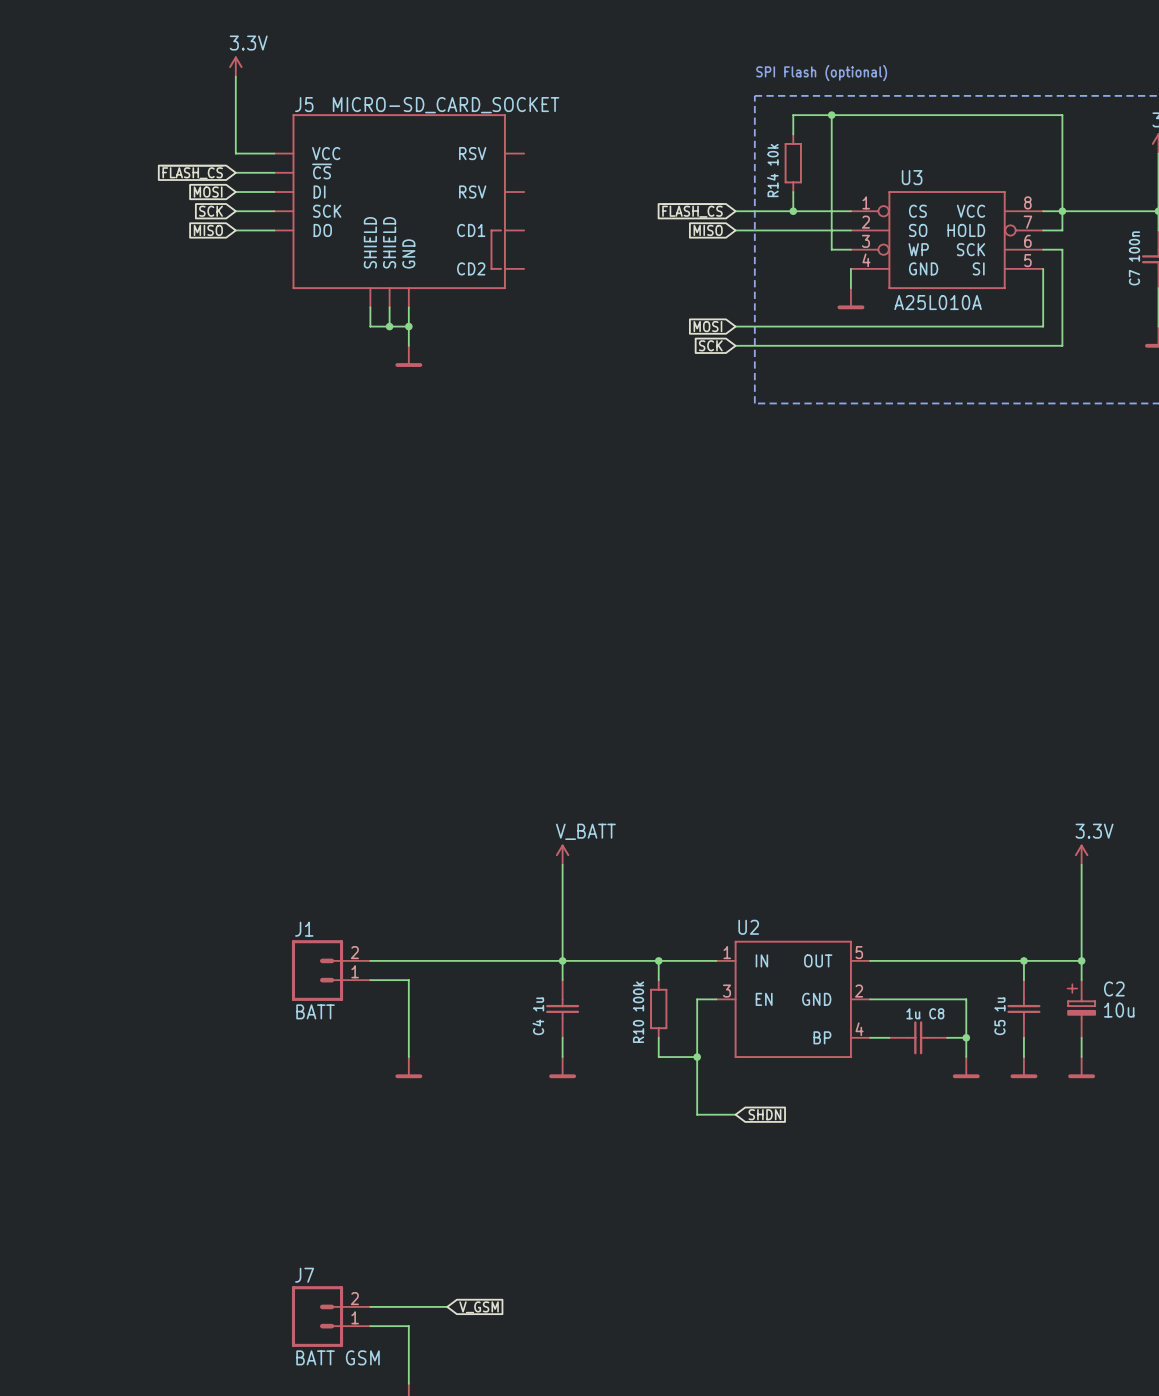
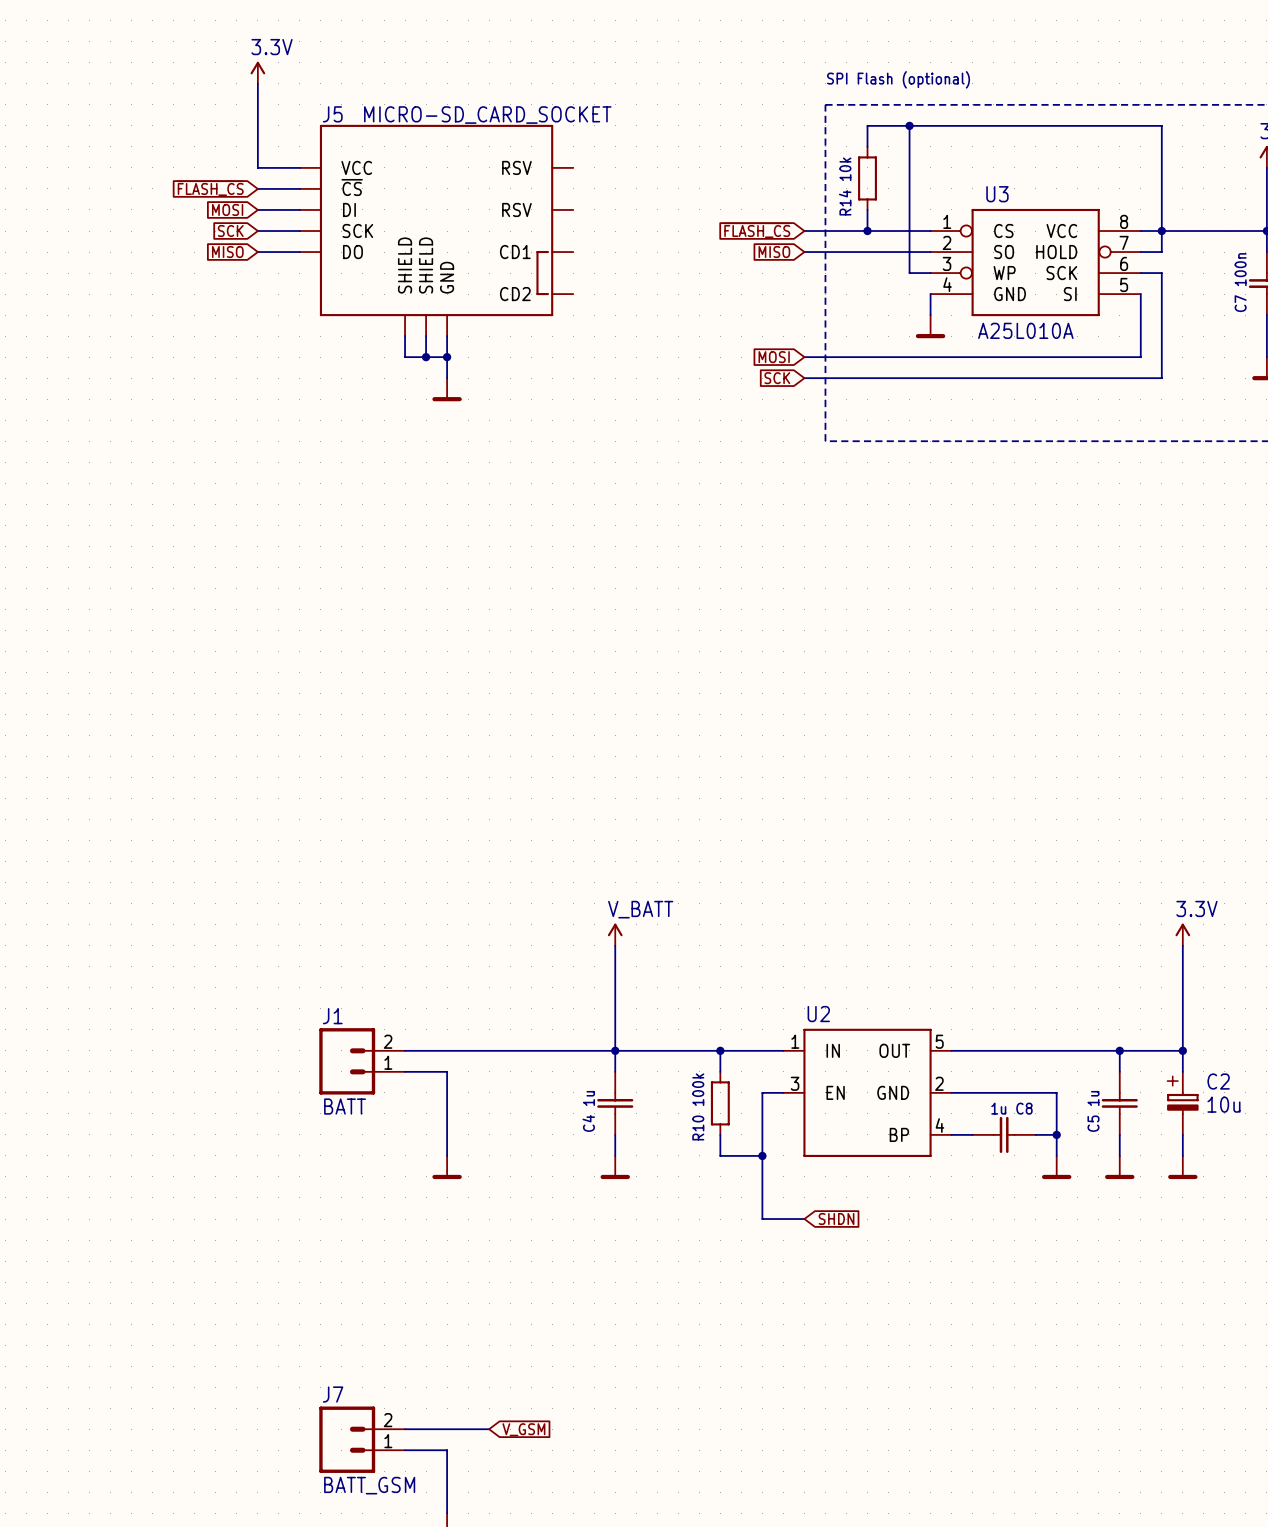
J7 value: BATT GSM (338, 1357) -> BATT_GSM (369, 1485)

